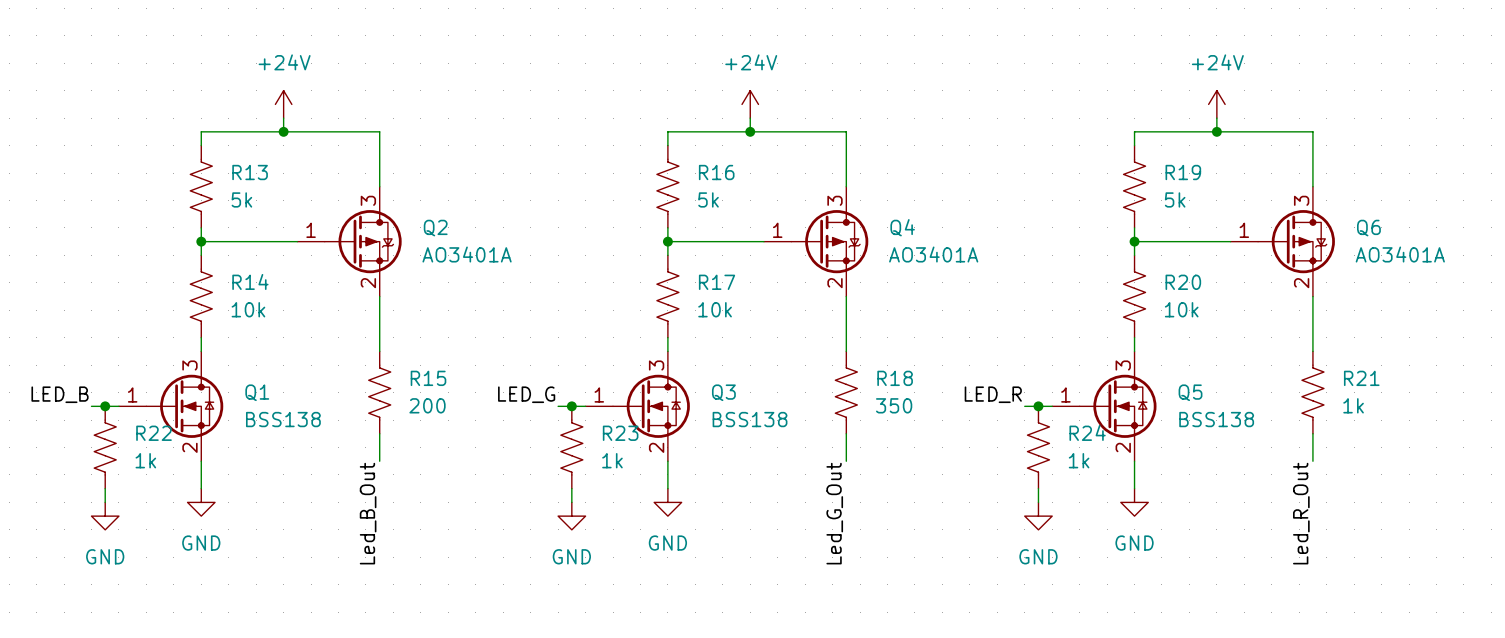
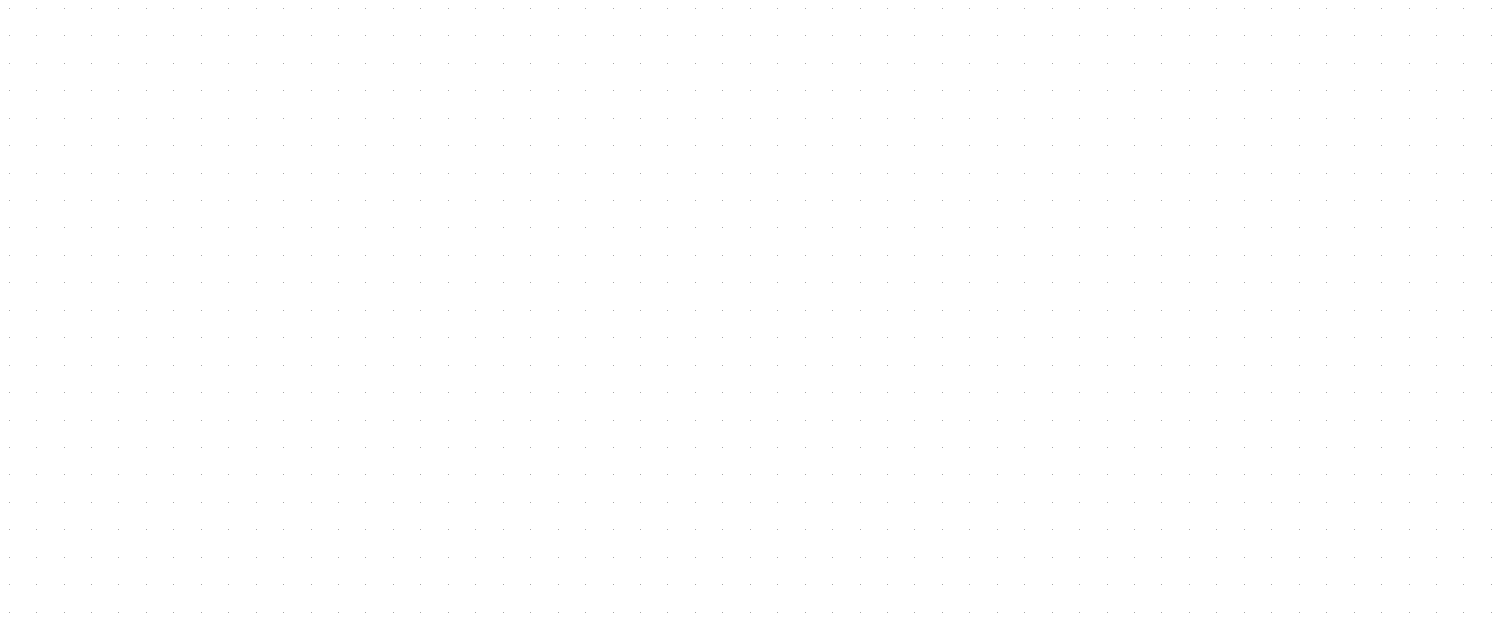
power symbol: +24V (283, 104) -> none
power symbol: +24V (750, 104) -> none
power symbol: +24V (1216, 104) -> none
wire: (283, 118) (283, 131) -> none
wire: (750, 118) (750, 131) -> none
wire: (1216, 118) (1216, 131) -> none
junction: (283, 131) -> none
junction: (750, 131) -> none
junction: (1216, 131) -> none
wire: (201, 145) (201, 131) (379, 131) (379, 186) -> none
wire: (667, 145) (667, 131) (846, 131) (846, 186) -> none
wire: (1134, 145) (1134, 131) (1312, 131) (1312, 186) -> none
R13: 5k (201, 186) -> none
R16: 5k (667, 186) -> none
R19: 5k (1134, 186) -> none
wire: (201, 227) (201, 255) -> none
wire: (667, 227) (667, 255) -> none
wire: (1134, 227) (1134, 255) -> none
wire: (201, 241) (297, 241) -> none
junction: (201, 241) -> none
Q2: AO3401A (349, 241) -> none
wire: (667, 241) (763, 241) -> none
junction: (667, 241) -> none
Q4: AO3401A (816, 241) -> none
wire: (1134, 241) (1230, 241) -> none
junction: (1134, 241) -> none
Q6: AO3401A (1282, 241) -> none
R14: 10k (201, 296) -> none
wire: (379, 296) (379, 351) -> none
R17: 10k (667, 296) -> none
wire: (846, 296) (846, 351) -> none
R20: 10k (1134, 296) -> none
wire: (1312, 296) (1312, 351) -> none
wire: (201, 337) (201, 351) -> none
wire: (667, 337) (667, 351) -> none
wire: (1134, 337) (1134, 351) -> none
R15: 200 (379, 392) -> none
R18: 350 (846, 392) -> none
R21: 1k (1312, 392) -> none
label: LED_B (60, 394) -> none
label: LED_G (526, 394) -> none
label: LED_R (993, 394) -> none
wire: (91, 406) (118, 406) -> none
junction: (105, 406) -> none
Q1: BSS138 (171, 406) -> none
wire: (558, 406) (585, 406) -> none
junction: (571, 406) -> none
Q3: BSS138 (637, 406) -> none
wire: (1024, 406) (1052, 406) -> none
junction: (1038, 406) -> none
Q5: BSS138 (1104, 406) -> none
wire: (379, 433) (379, 461) -> none
wire: (846, 433) (846, 461) -> none
wire: (1312, 433) (1312, 461) -> none
R22: 1k (105, 447) -> none
R23: 1k (571, 447) -> none
R24: 1k (1038, 447) -> none
wire: (201, 461) (201, 488) -> none
wire: (667, 461) (667, 488) -> none
wire: (1134, 461) (1134, 488) -> none
wire: (105, 488) (105, 502) -> none
wire: (571, 488) (571, 502) -> none
wire: (1038, 488) (1038, 502) -> none
power symbol: GND (201, 502) -> none
power symbol: GND (667, 502) -> none
power symbol: GND (1134, 502) -> none
label: Led_B_Out (368, 513) -> none
label: Led_G_Out (834, 513) -> none
label: Led_R_Out (1301, 513) -> none
power symbol: GND (105, 516) -> none
power symbol: GND (571, 516) -> none
power symbol: GND (1038, 516) -> none

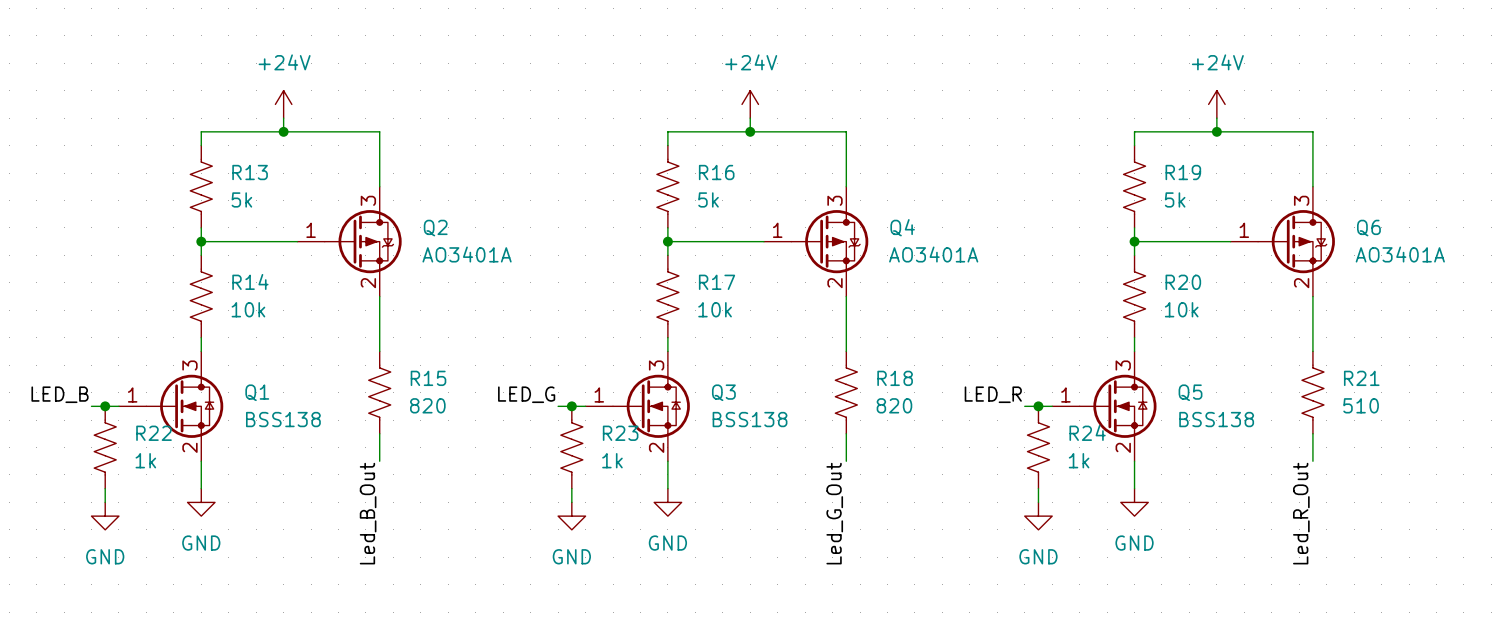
power symbol: none -> +24V (283, 104)
power symbol: none -> +24V (750, 104)
power symbol: none -> +24V (1216, 104)
wire: none -> (283, 118) (283, 131)
wire: none -> (750, 118) (750, 131)
wire: none -> (1216, 118) (1216, 131)
junction: none -> (283, 131)
junction: none -> (750, 131)
junction: none -> (1216, 131)
wire: none -> (201, 145) (201, 131) (379, 131) (379, 186)
wire: none -> (667, 145) (667, 131) (846, 131) (846, 186)
wire: none -> (1134, 145) (1134, 131) (1312, 131) (1312, 186)
R13: none -> 5k (201, 186)
R16: none -> 5k (667, 186)
R19: none -> 5k (1134, 186)
wire: none -> (201, 227) (201, 255)
wire: none -> (667, 227) (667, 255)
wire: none -> (1134, 227) (1134, 255)
wire: none -> (201, 241) (297, 241)
junction: none -> (201, 241)
Q2: none -> AO3401A (349, 241)
wire: none -> (667, 241) (763, 241)
junction: none -> (667, 241)
Q4: none -> AO3401A (816, 241)
wire: none -> (1134, 241) (1230, 241)
junction: none -> (1134, 241)
Q6: none -> AO3401A (1282, 241)
R14: none -> 10k (201, 296)
wire: none -> (379, 296) (379, 351)
R17: none -> 10k (667, 296)
wire: none -> (846, 296) (846, 351)
R20: none -> 10k (1134, 296)
wire: none -> (1312, 296) (1312, 351)
wire: none -> (201, 337) (201, 351)
wire: none -> (667, 337) (667, 351)
wire: none -> (1134, 337) (1134, 351)
R15: none -> 820 (379, 392)
R18: none -> 820 (846, 392)
R21: none -> 510 (1312, 392)
label: none -> LED_B (60, 394)
label: none -> LED_G (526, 394)
label: none -> LED_R (993, 394)
wire: none -> (91, 406) (118, 406)
junction: none -> (105, 406)
Q1: none -> BSS138 (171, 406)
wire: none -> (558, 406) (585, 406)
junction: none -> (571, 406)
Q3: none -> BSS138 (637, 406)
wire: none -> (1024, 406) (1052, 406)
junction: none -> (1038, 406)
Q5: none -> BSS138 (1104, 406)
wire: none -> (379, 433) (379, 461)
wire: none -> (846, 433) (846, 461)
wire: none -> (1312, 433) (1312, 461)
R22: none -> 1k (105, 447)
R23: none -> 1k (571, 447)
R24: none -> 1k (1038, 447)
wire: none -> (201, 461) (201, 488)
wire: none -> (667, 461) (667, 488)
wire: none -> (1134, 461) (1134, 488)
wire: none -> (105, 488) (105, 502)
wire: none -> (571, 488) (571, 502)
wire: none -> (1038, 488) (1038, 502)
power symbol: none -> GND (201, 502)
power symbol: none -> GND (667, 502)
power symbol: none -> GND (1134, 502)
label: none -> Led_B_Out (368, 513)
label: none -> Led_G_Out (834, 513)
label: none -> Led_R_Out (1301, 513)
power symbol: none -> GND (105, 516)
power symbol: none -> GND (571, 516)
power symbol: none -> GND (1038, 516)

